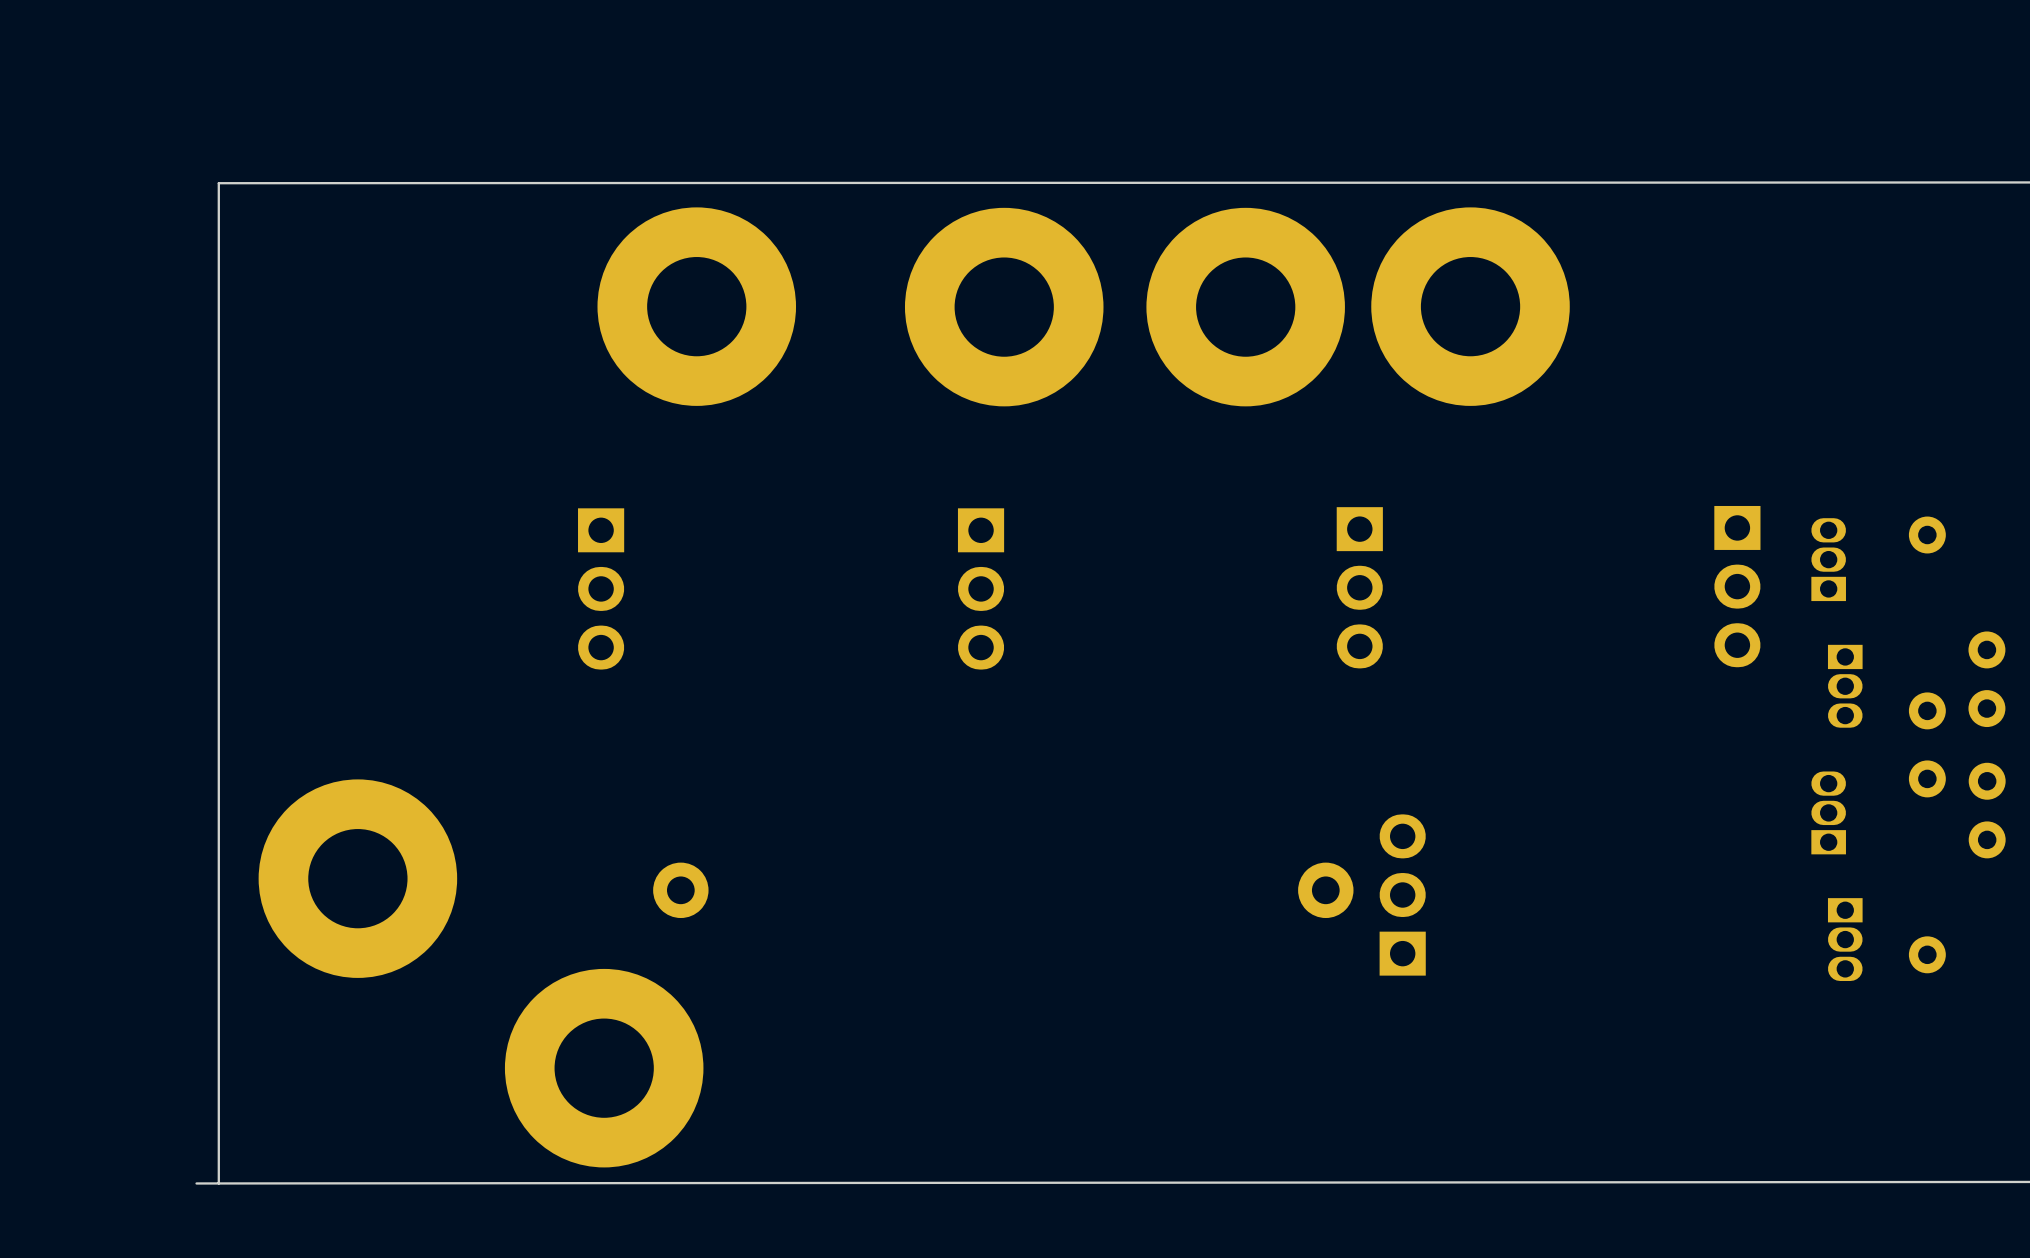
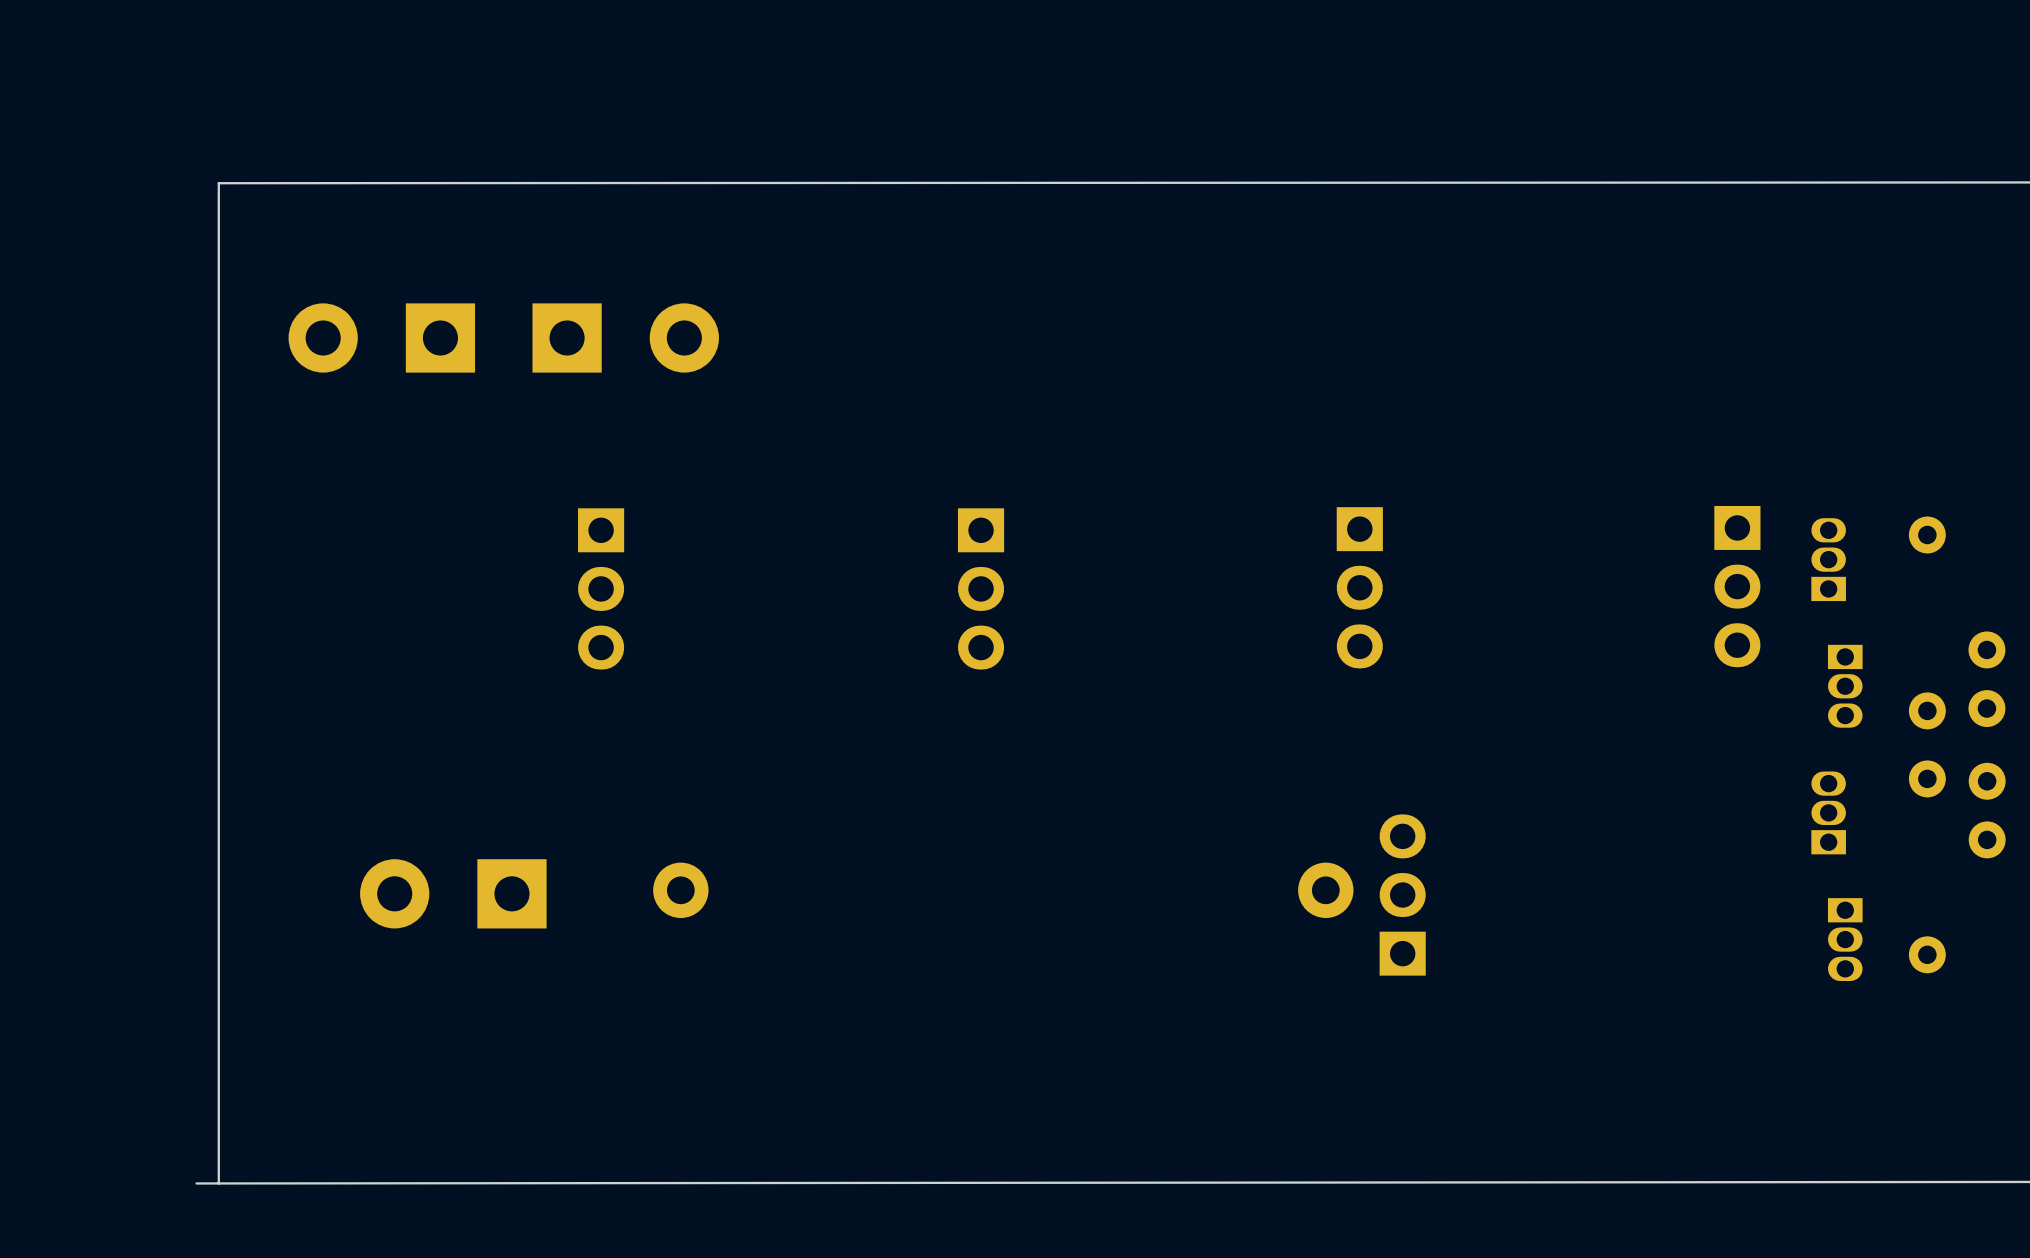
part: (696, 306) -> none
part: (1470, 306) -> none
part: (1004, 307) -> none
part: (1245, 307) -> none
part: none -> (381, 337)
part: none -> (625, 337)
part: (357, 878) -> none
part: none -> (453, 893)
part: (604, 1068) -> none

